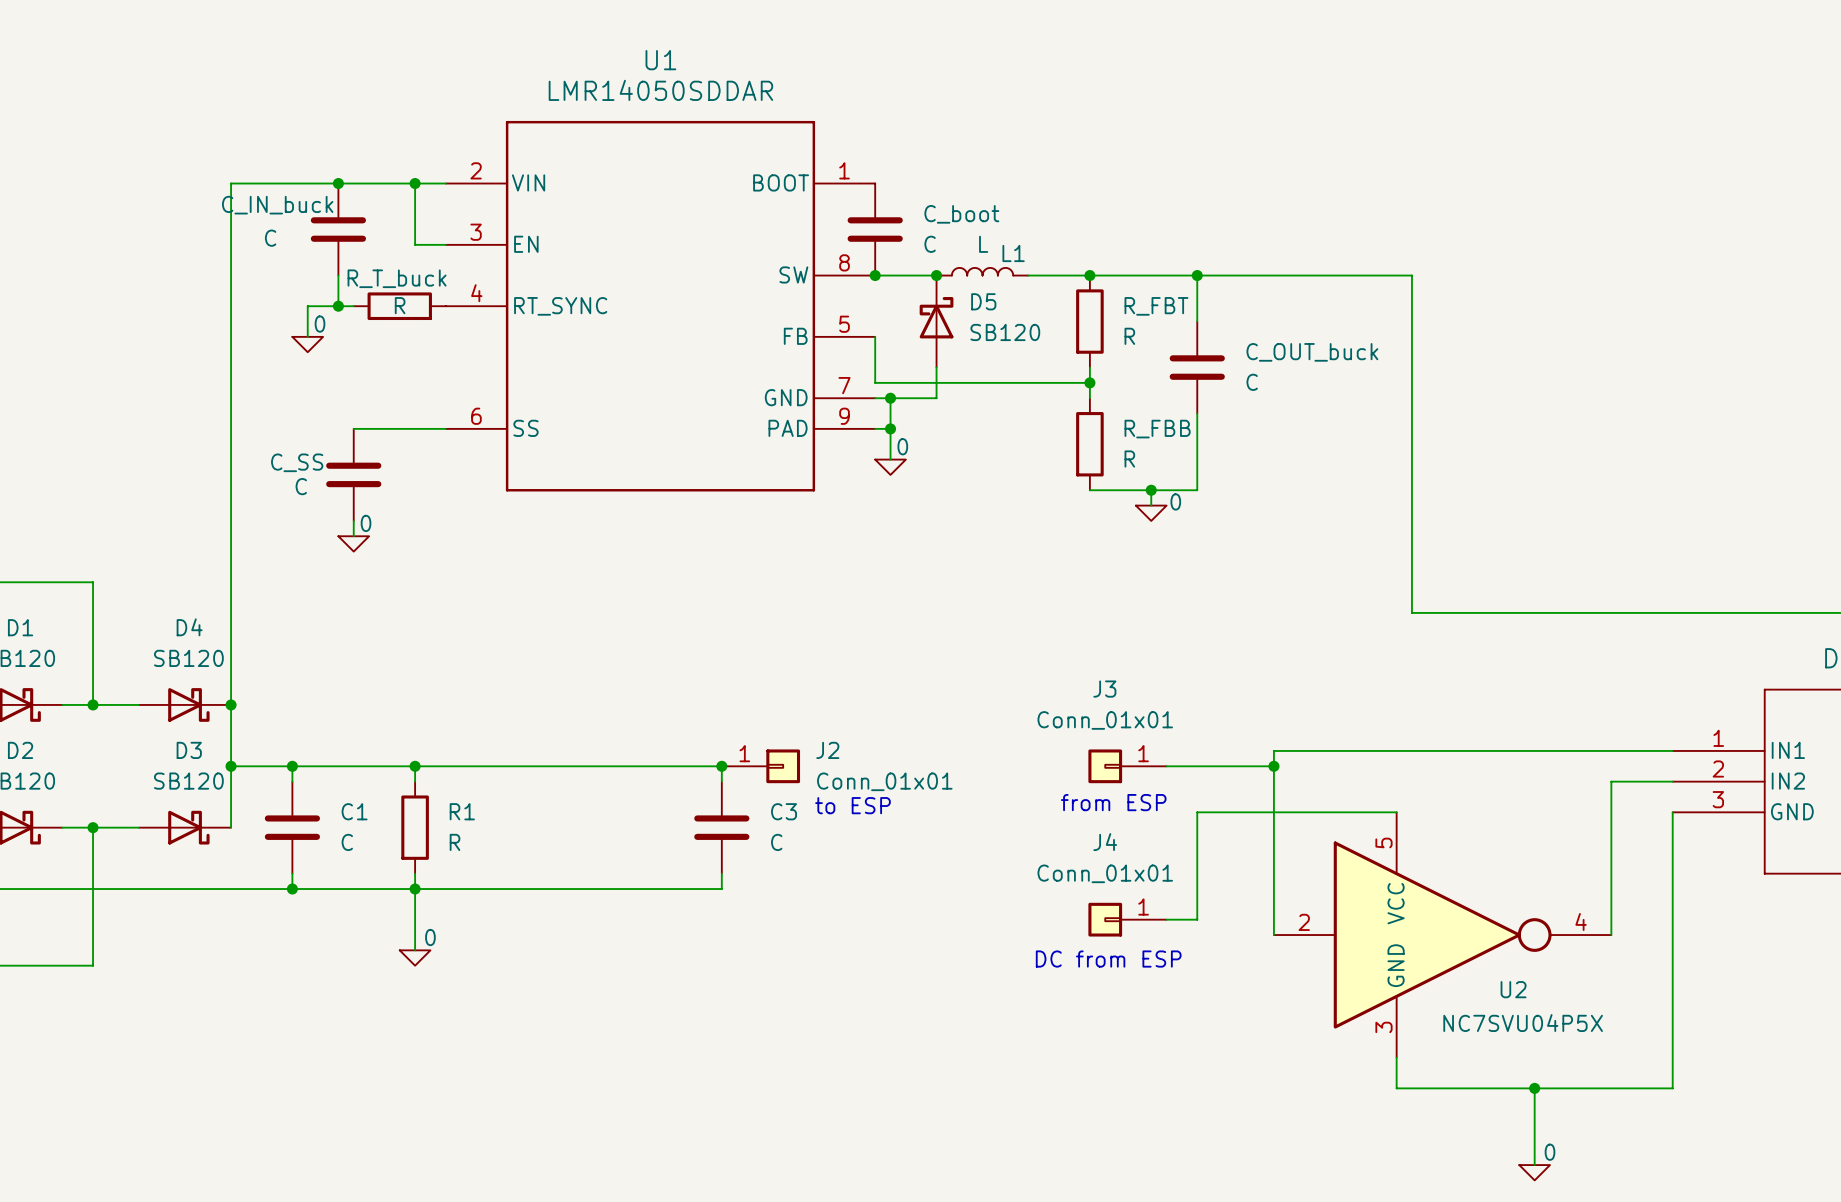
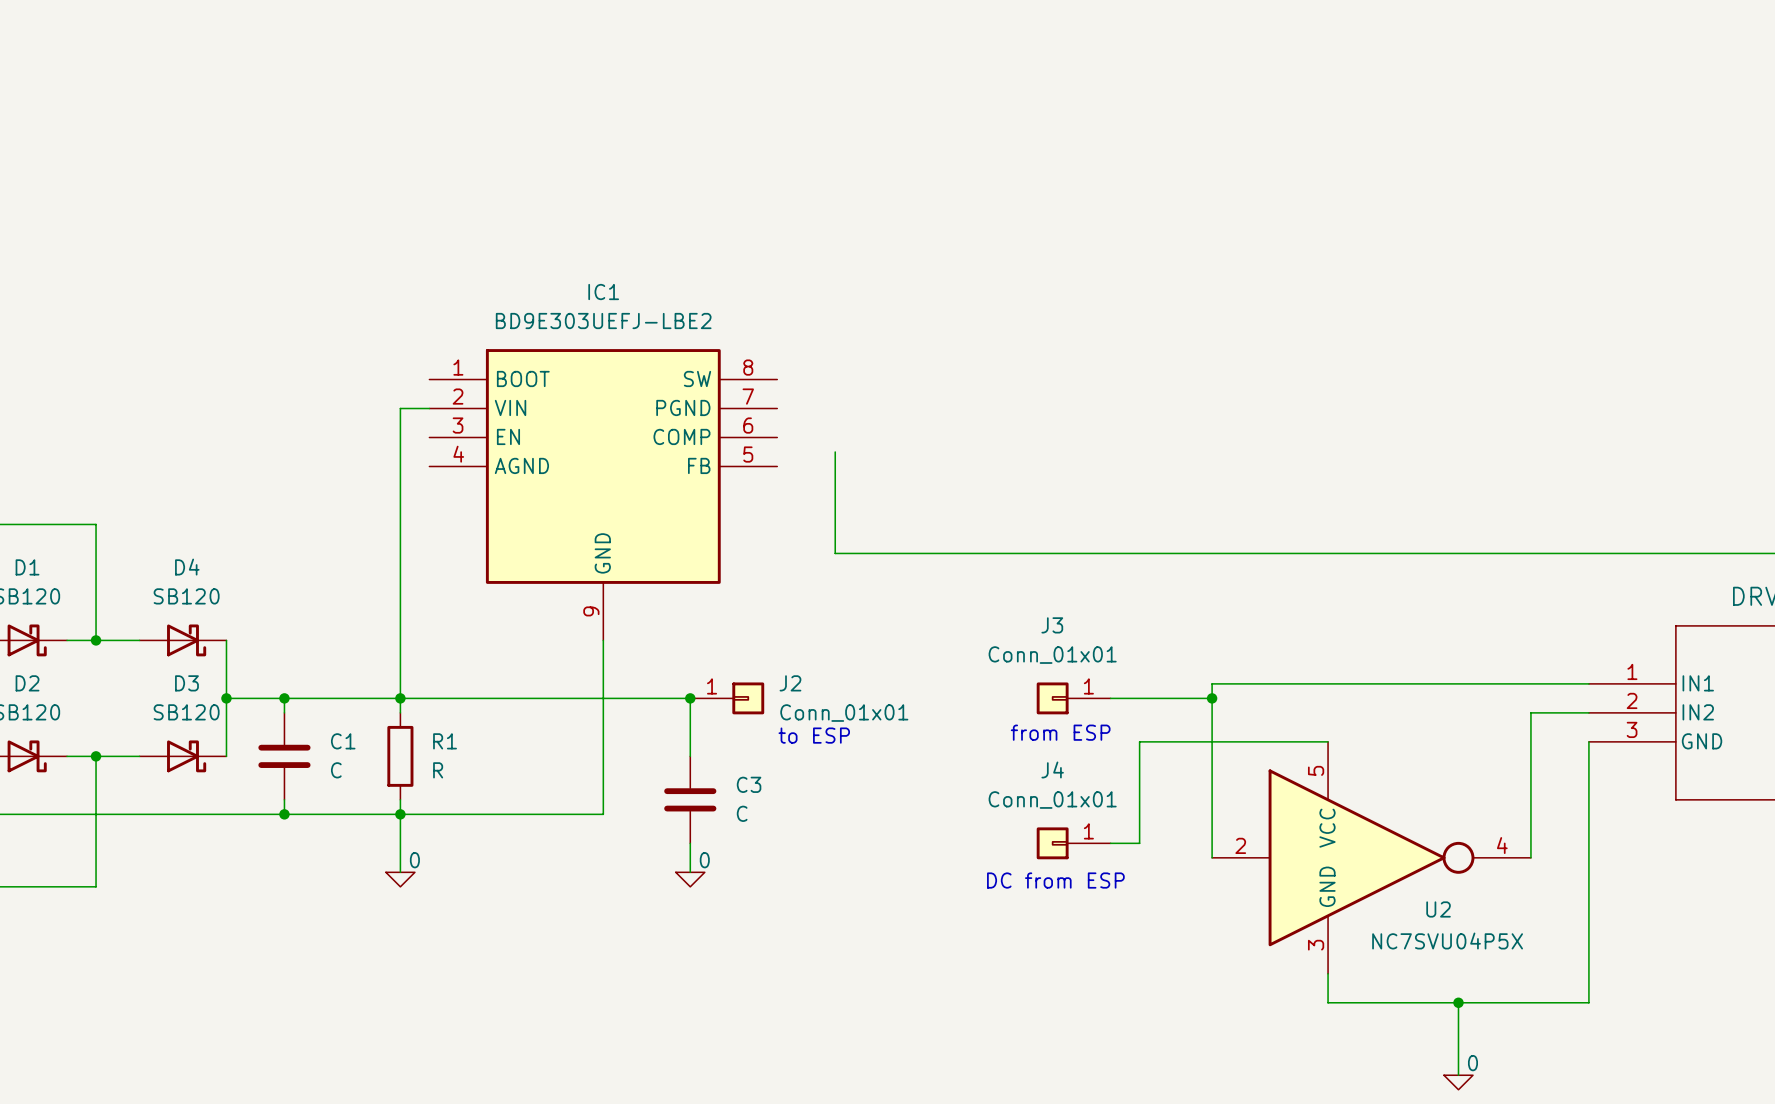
junction: (338, 183) -> none
wire: (415, 183) (415, 244) (445, 244) -> none
junction: (415, 183) -> none
wire: (445, 183) (231, 183) (231, 704) -> none
C_IN_buck: C (338, 229) -> none
C_boot: C (875, 229) -> none
L1: L (982, 271) -> none
wire: (338, 275) (338, 306) -> none
wire: (875, 275) (936, 275) -> none
junction: (875, 275) -> none
junction: (936, 275) -> none
wire: (1028, 275) (1411, 275) (1411, 612) -> (835, 451) (835, 553) (1342, 553)
junction: (1089, 275) -> none
wire: (1197, 275) (1197, 321) -> none
junction: (1197, 275) -> none
junction: (338, 306) -> none
wire: (353, 306) (307, 306) (307, 336) -> none
R_T_buck: R (399, 306) -> none
U1: LMR14050SDDAR (660, 306) -> none
D5: SB120 (936, 321) -> none
R_FBT: R (1089, 321) -> none
wire: (875, 336) (875, 382) (1089, 382) -> none
power symbol: 0 (307, 344) -> none
wire: (936, 367) (936, 398) (875, 398) -> none
wire: (1089, 367) (1089, 398) -> none
C_OUT_buck: C (1197, 367) -> none
junction: (1089, 382) -> none
wire: (890, 398) (890, 459) -> none
junction: (890, 398) -> none
wire: (1197, 413) (1197, 490) (1089, 490) -> none
wire: (353, 428) (445, 428) -> none
wire: (875, 428) (890, 428) -> none
junction: (890, 428) -> none
R_FBB: R (1089, 444) -> none
wire: none -> (429, 408) (400, 408) (400, 698)
power symbol: 0 (890, 467) -> none
C_SS: C (353, 474) -> none
wire: (1151, 490) (1151, 505) -> none
junction: (1151, 490) -> none
power symbol: 0 (1151, 513) -> none
wire: (353, 520) (353, 536) -> none
power symbol: 0 (353, 543) -> none
IC1: none -> BD9E303UEFJ-LBE2 (603, 494)
junction: (231, 704) -> none
C3 position: (721, 827) -> (690, 799)
wire: (721, 873) (721, 889) (629, 889) -> (603, 640) (603, 814)
wire: none -> (690, 843) (690, 872)
power symbol: none -> 0 (690, 879)

